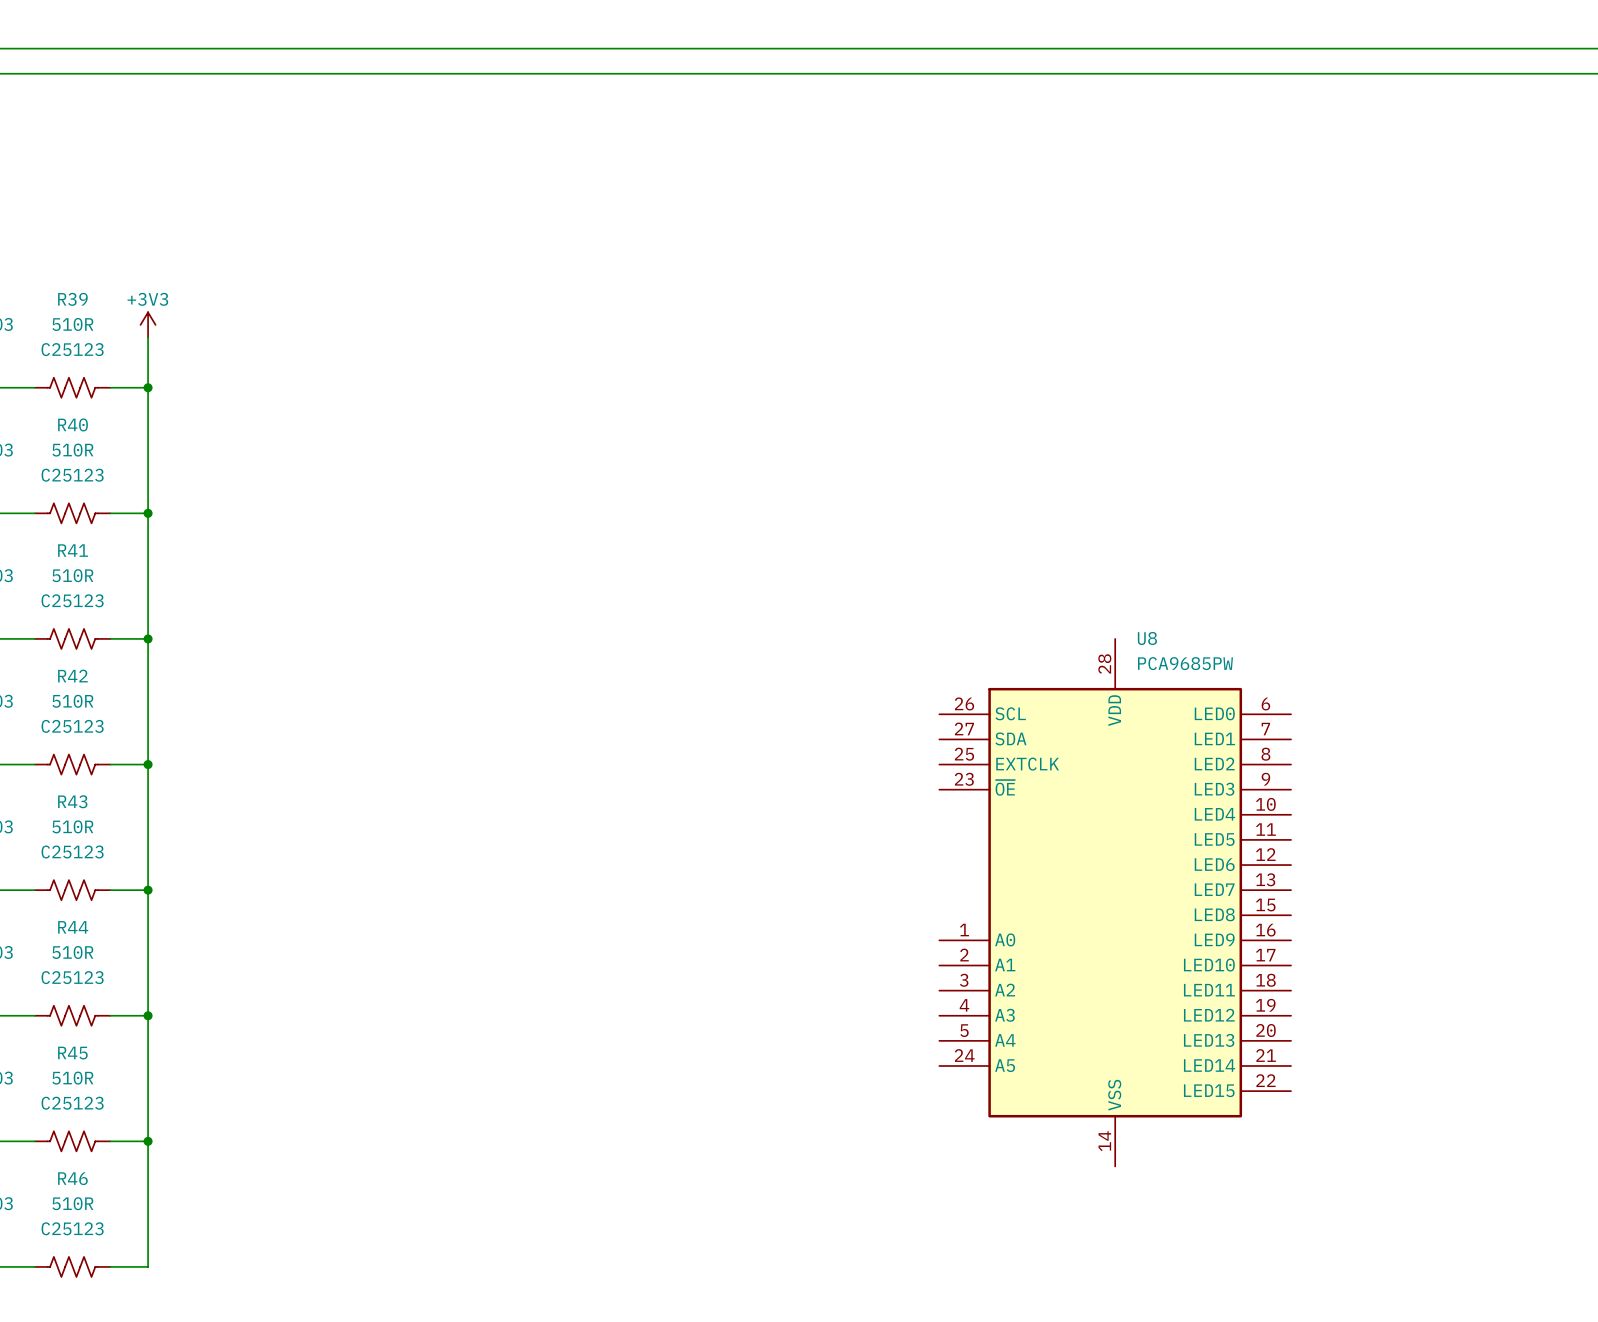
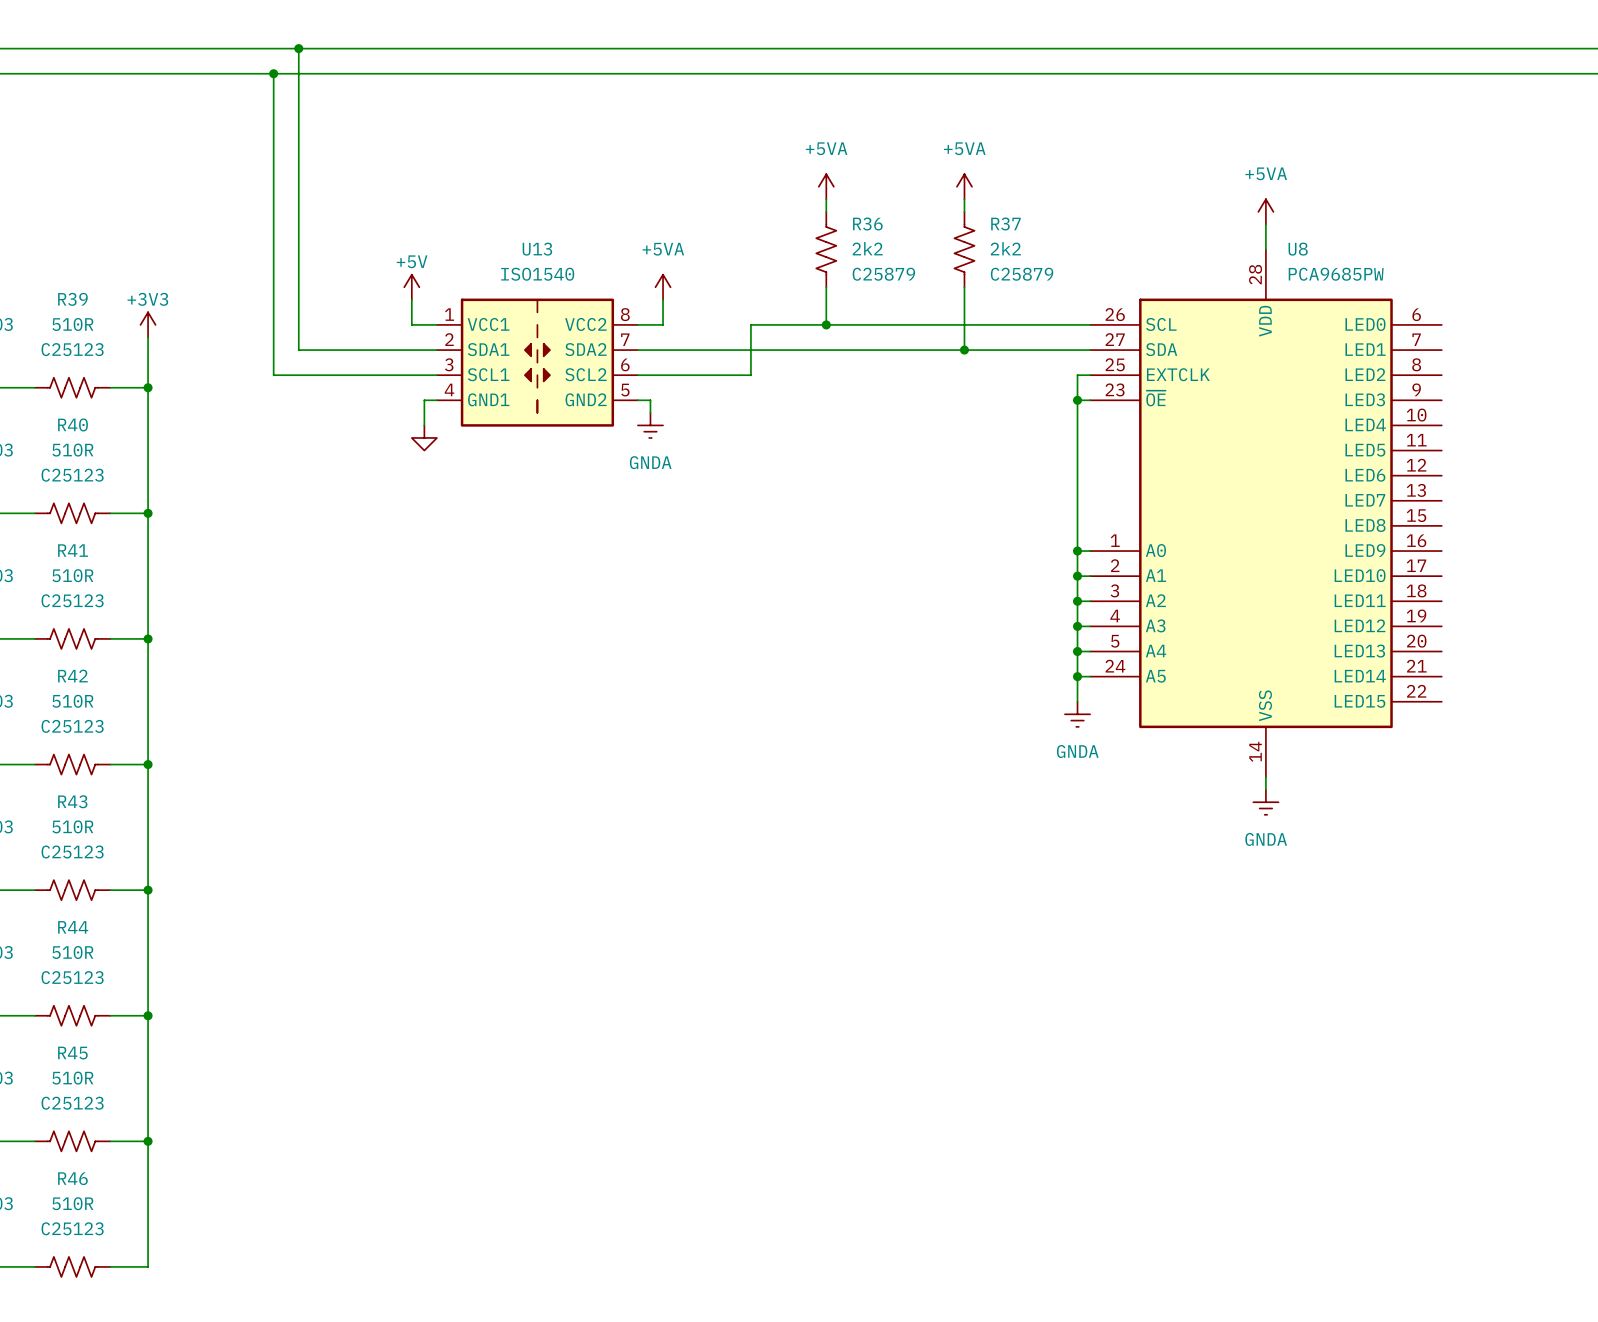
wire: none -> (298, 48) (298, 350) (436, 350)
junction: none -> (298, 48)
wire: none -> (273, 73) (273, 375) (436, 375)
junction: none -> (273, 73)
power symbol: none -> +5VA (826, 186)
power symbol: none -> +5VA (964, 186)
wire: none -> (826, 199) (826, 211)
wire: none -> (964, 199) (964, 211)
power symbol: none -> +5VA (1265, 211)
wire: none -> (1265, 224) (1265, 249)
R36: none -> 2k2 (826, 249)
R37: none -> 2k2 (964, 249)
power symbol: none -> +5V (411, 287)
power symbol: none -> +5VA (663, 287)
wire: none -> (826, 287) (826, 324)
wire: none -> (964, 287) (964, 350)
wire: none -> (411, 299) (411, 324) (436, 324)
wire: none -> (663, 299) (663, 324) (637, 324)
junction: none -> (826, 324)
wire: none -> (1090, 324) (750, 324) (750, 375) (637, 375)
wire: none -> (637, 350) (1090, 350)
junction: none -> (964, 350)
U13: none -> ISO1540 (537, 362)
wire: none -> (1090, 375) (1077, 375) (1077, 701)
wire: none -> (436, 400) (424, 400) (424, 425)
wire: none -> (637, 400) (650, 400) (650, 412)
wire: none -> (1077, 400) (1090, 400)
junction: none -> (1077, 400)
power symbol: none -> GNDA (650, 425)
power symbol: none -> (424, 437)
wire: none -> (1077, 551) (1090, 551)
junction: none -> (1077, 551)
wire: none -> (1077, 576) (1090, 576)
junction: none -> (1077, 576)
wire: none -> (1077, 601) (1090, 601)
junction: none -> (1077, 601)
wire: none -> (1077, 626) (1090, 626)
junction: none -> (1077, 626)
wire: none -> (1077, 651) (1090, 651)
junction: none -> (1077, 651)
wire: none -> (1077, 676) (1090, 676)
junction: none -> (1077, 676)
power symbol: none -> GNDA (1077, 714)
wire: none -> (1265, 777) (1265, 789)
power symbol: none -> GNDA (1265, 802)
U8 position: (1115, 902) -> (1265, 513)

